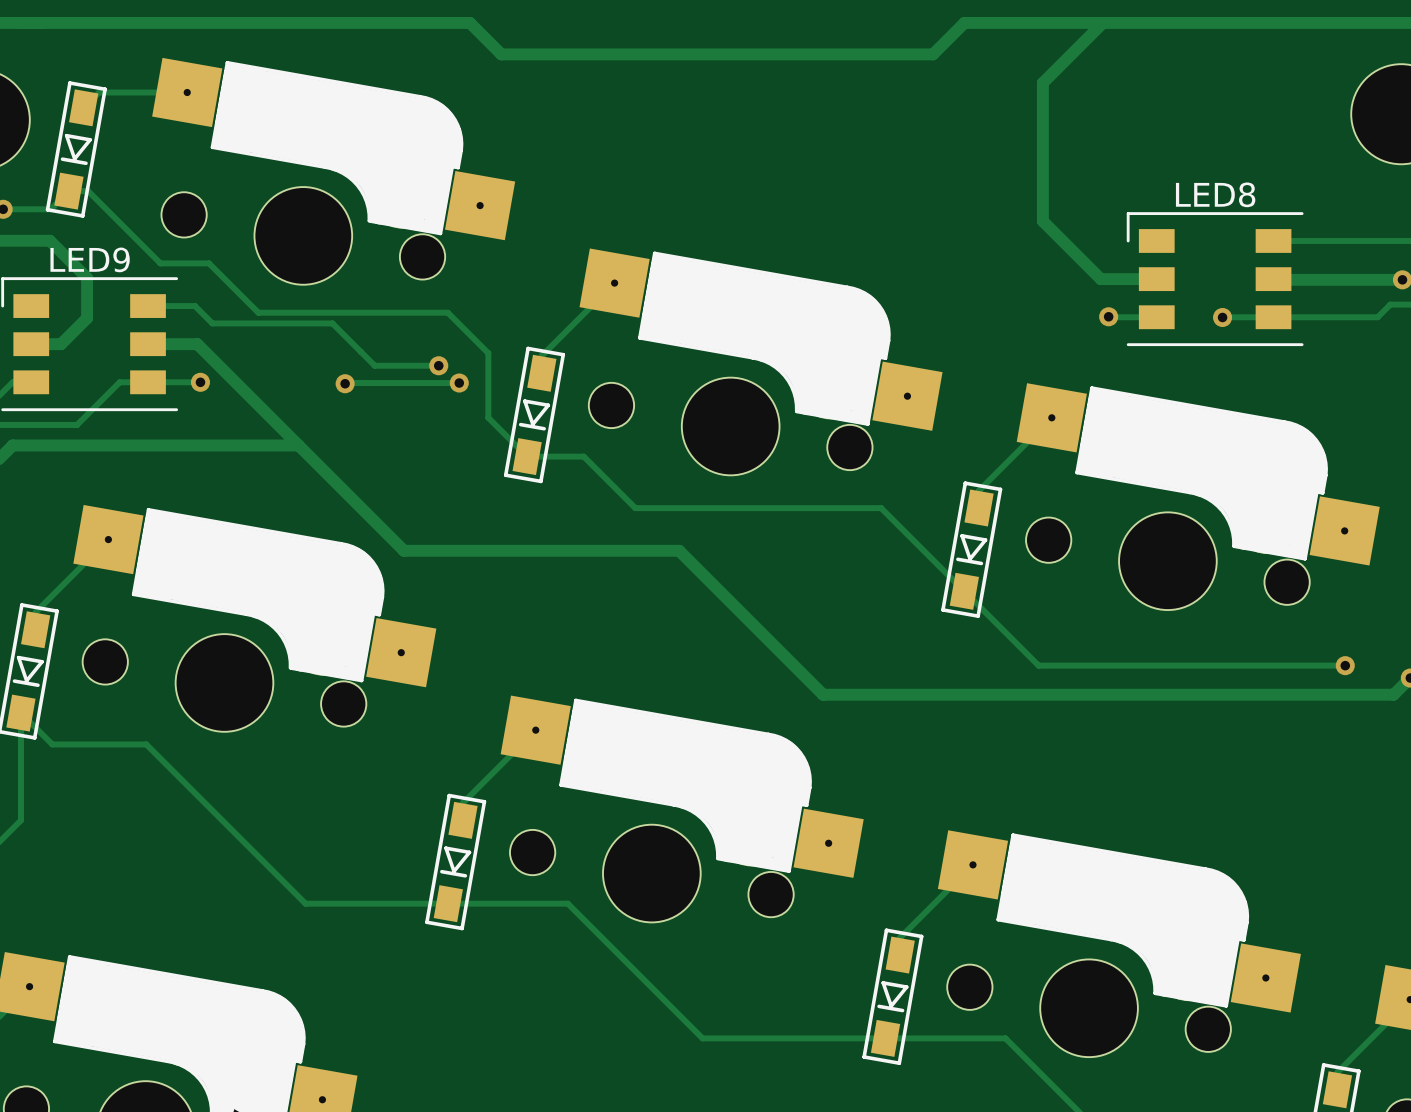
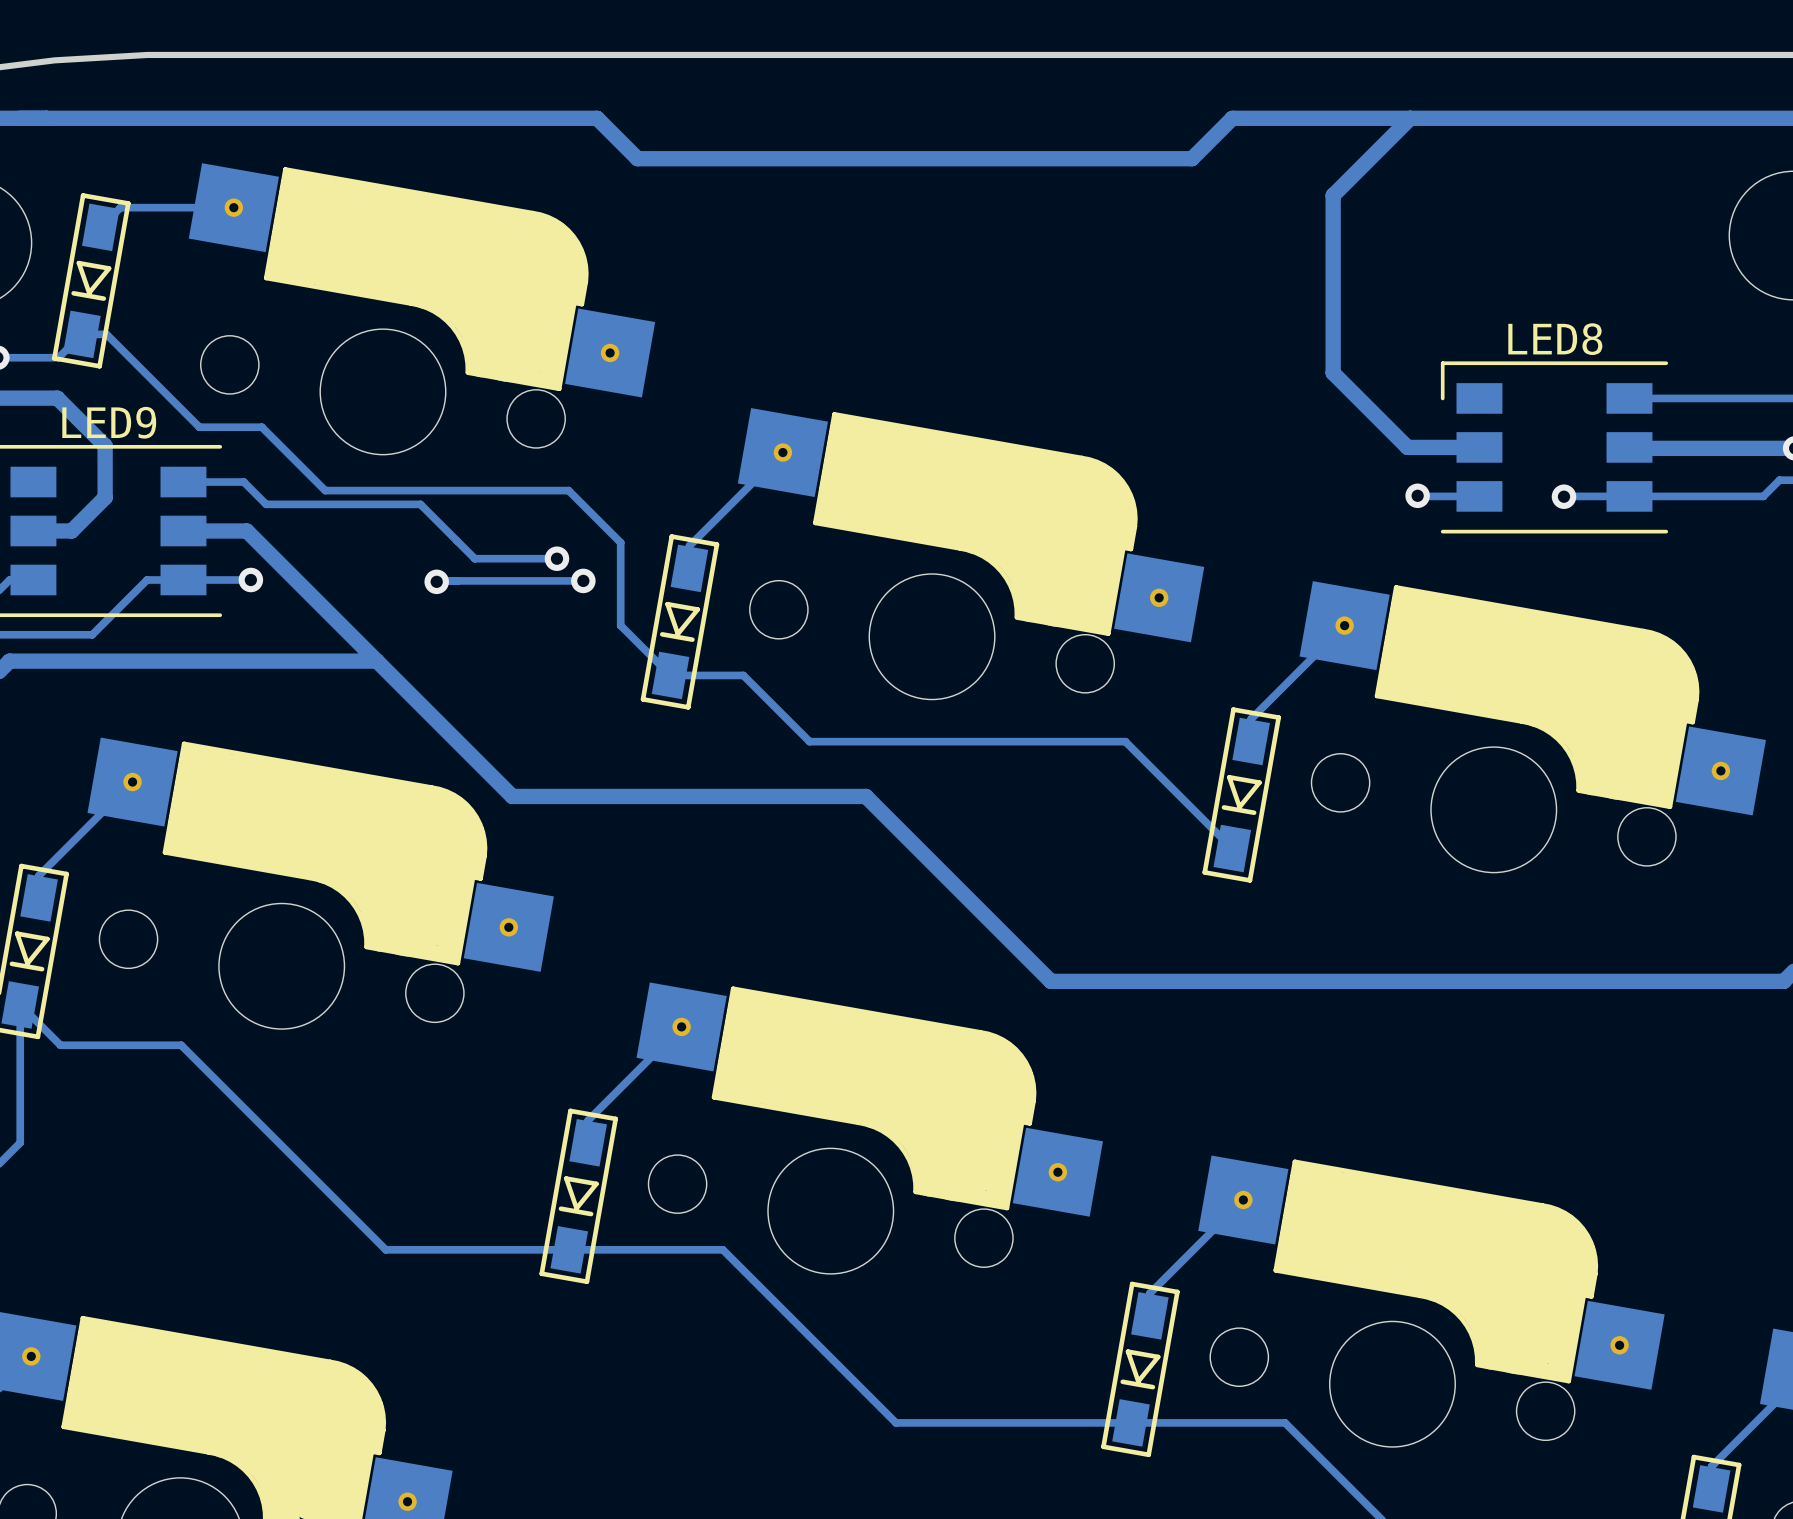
track: (964, 591) (1038, 665) (1345, 665) -> none
via: (1345, 665) -> none

